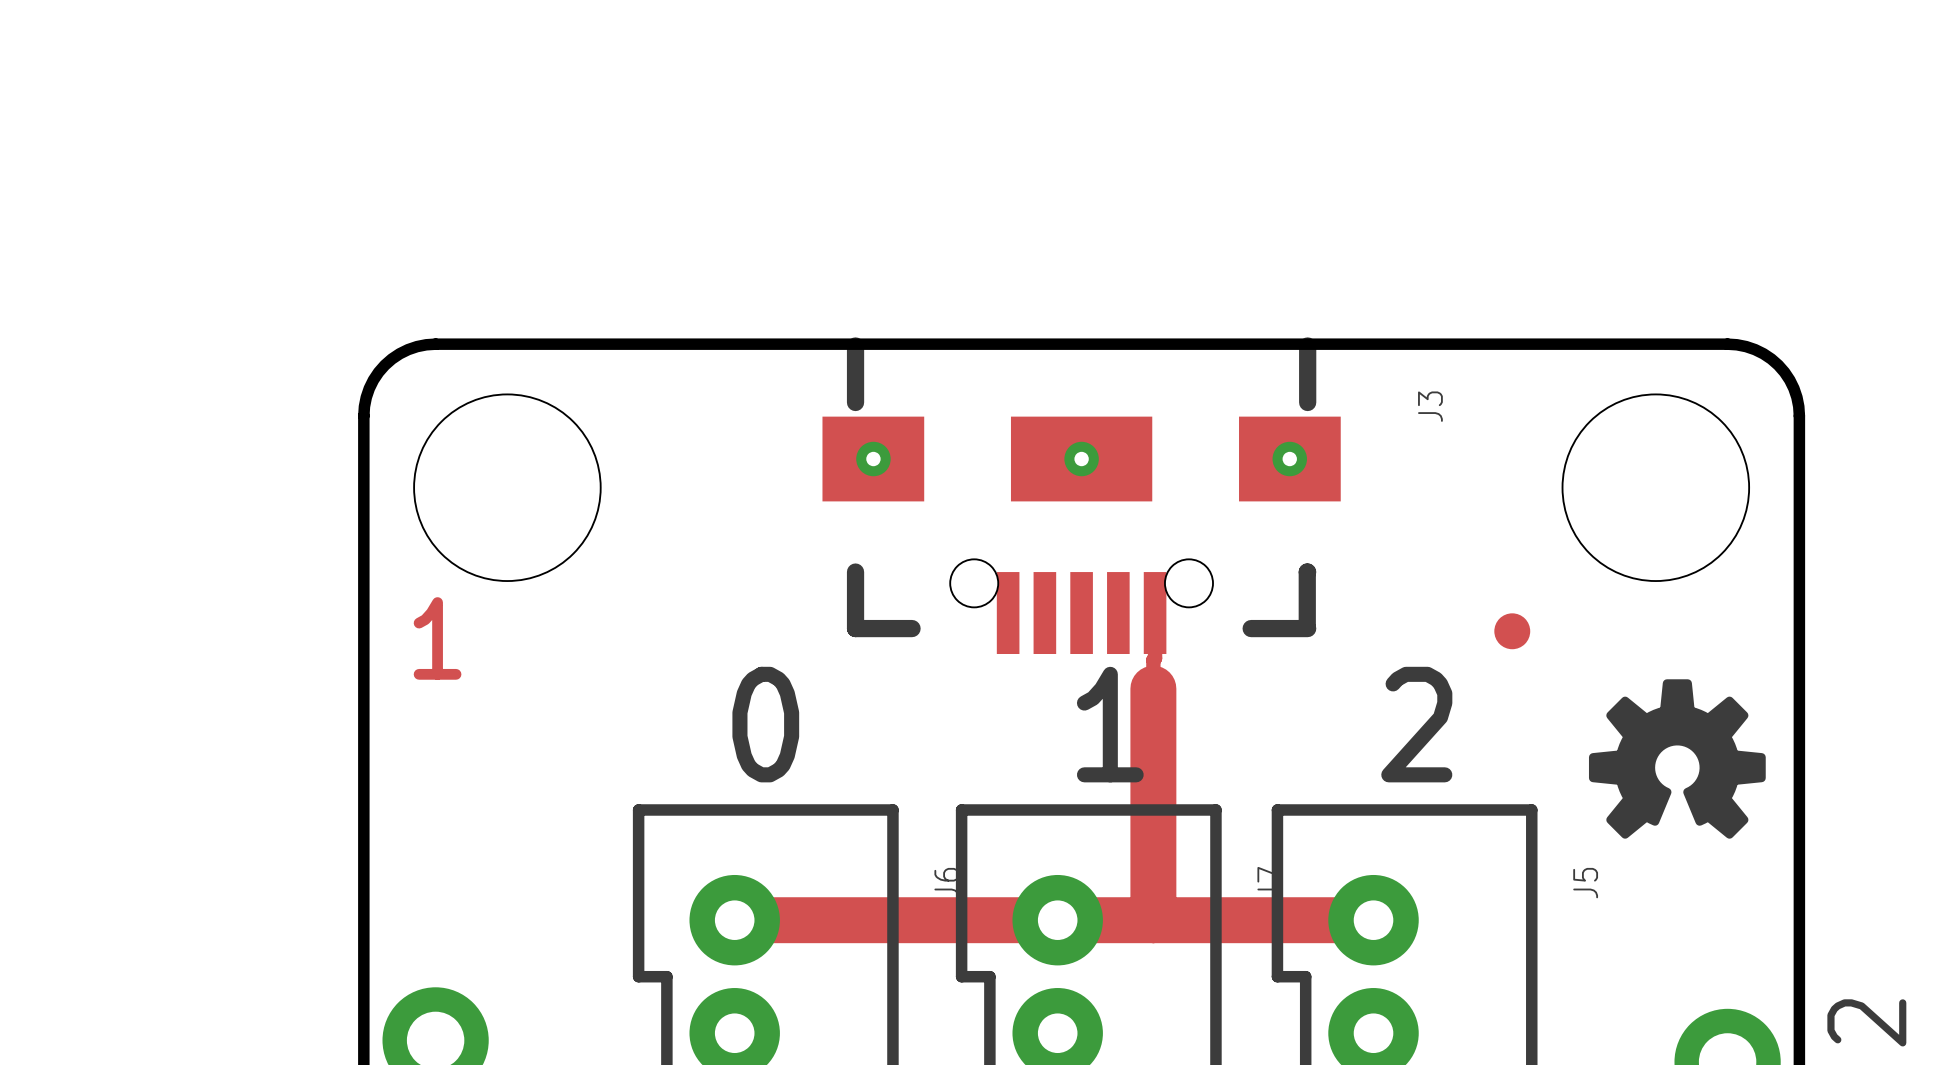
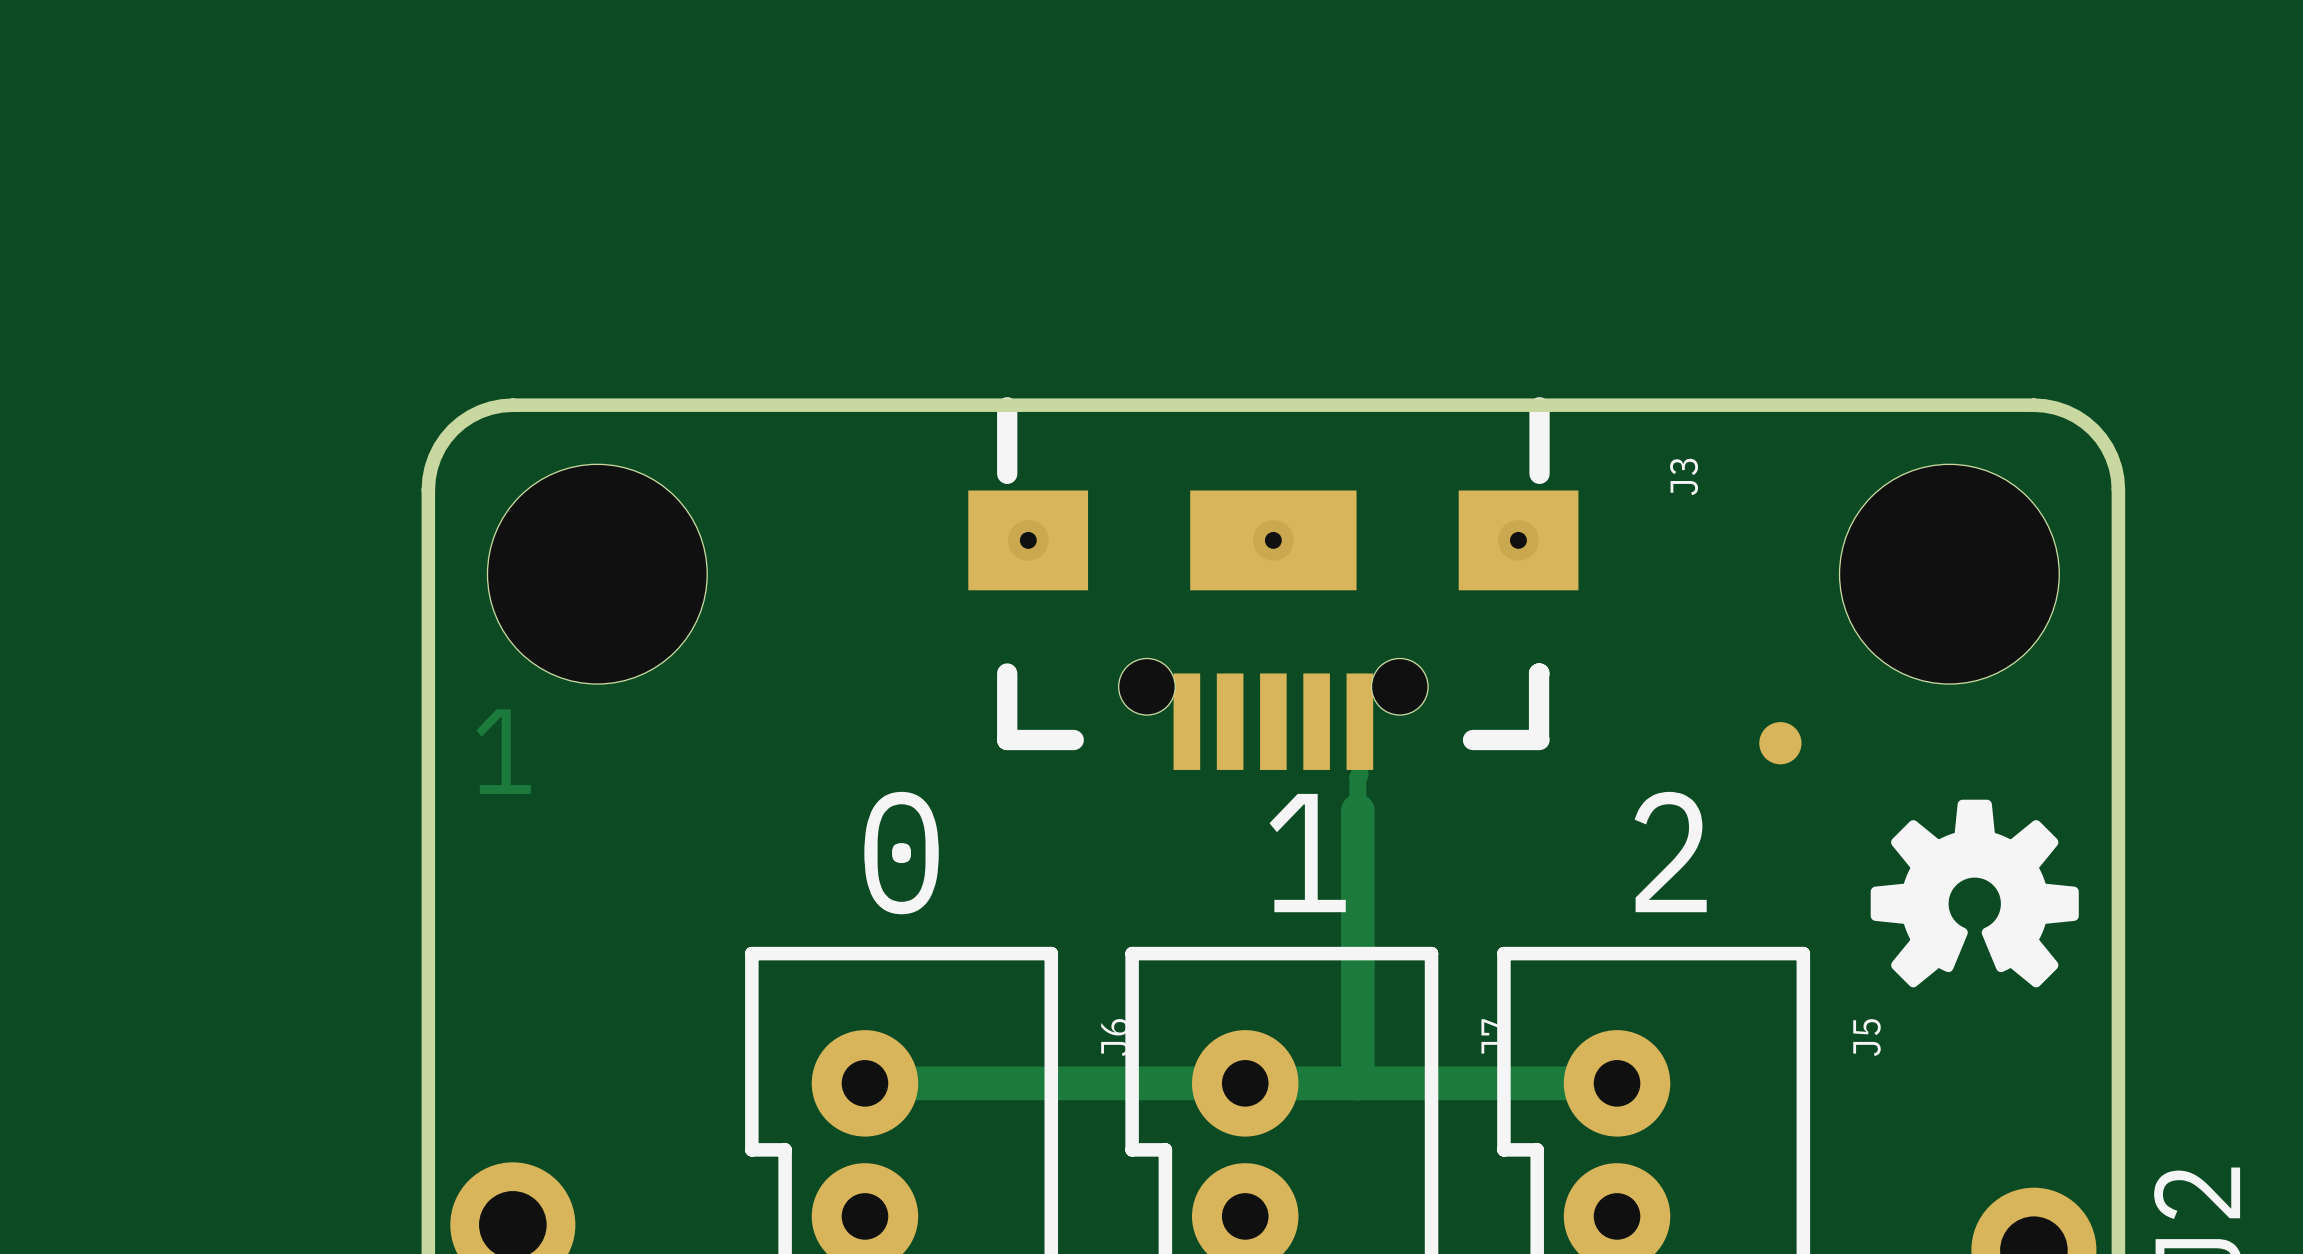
track width: thick (1153, 688) (1153, 920) -> thin (1357, 810) (1357, 1083)
track width: thick (734, 920) (1373, 920) -> thin (864, 1083) (1617, 1083)

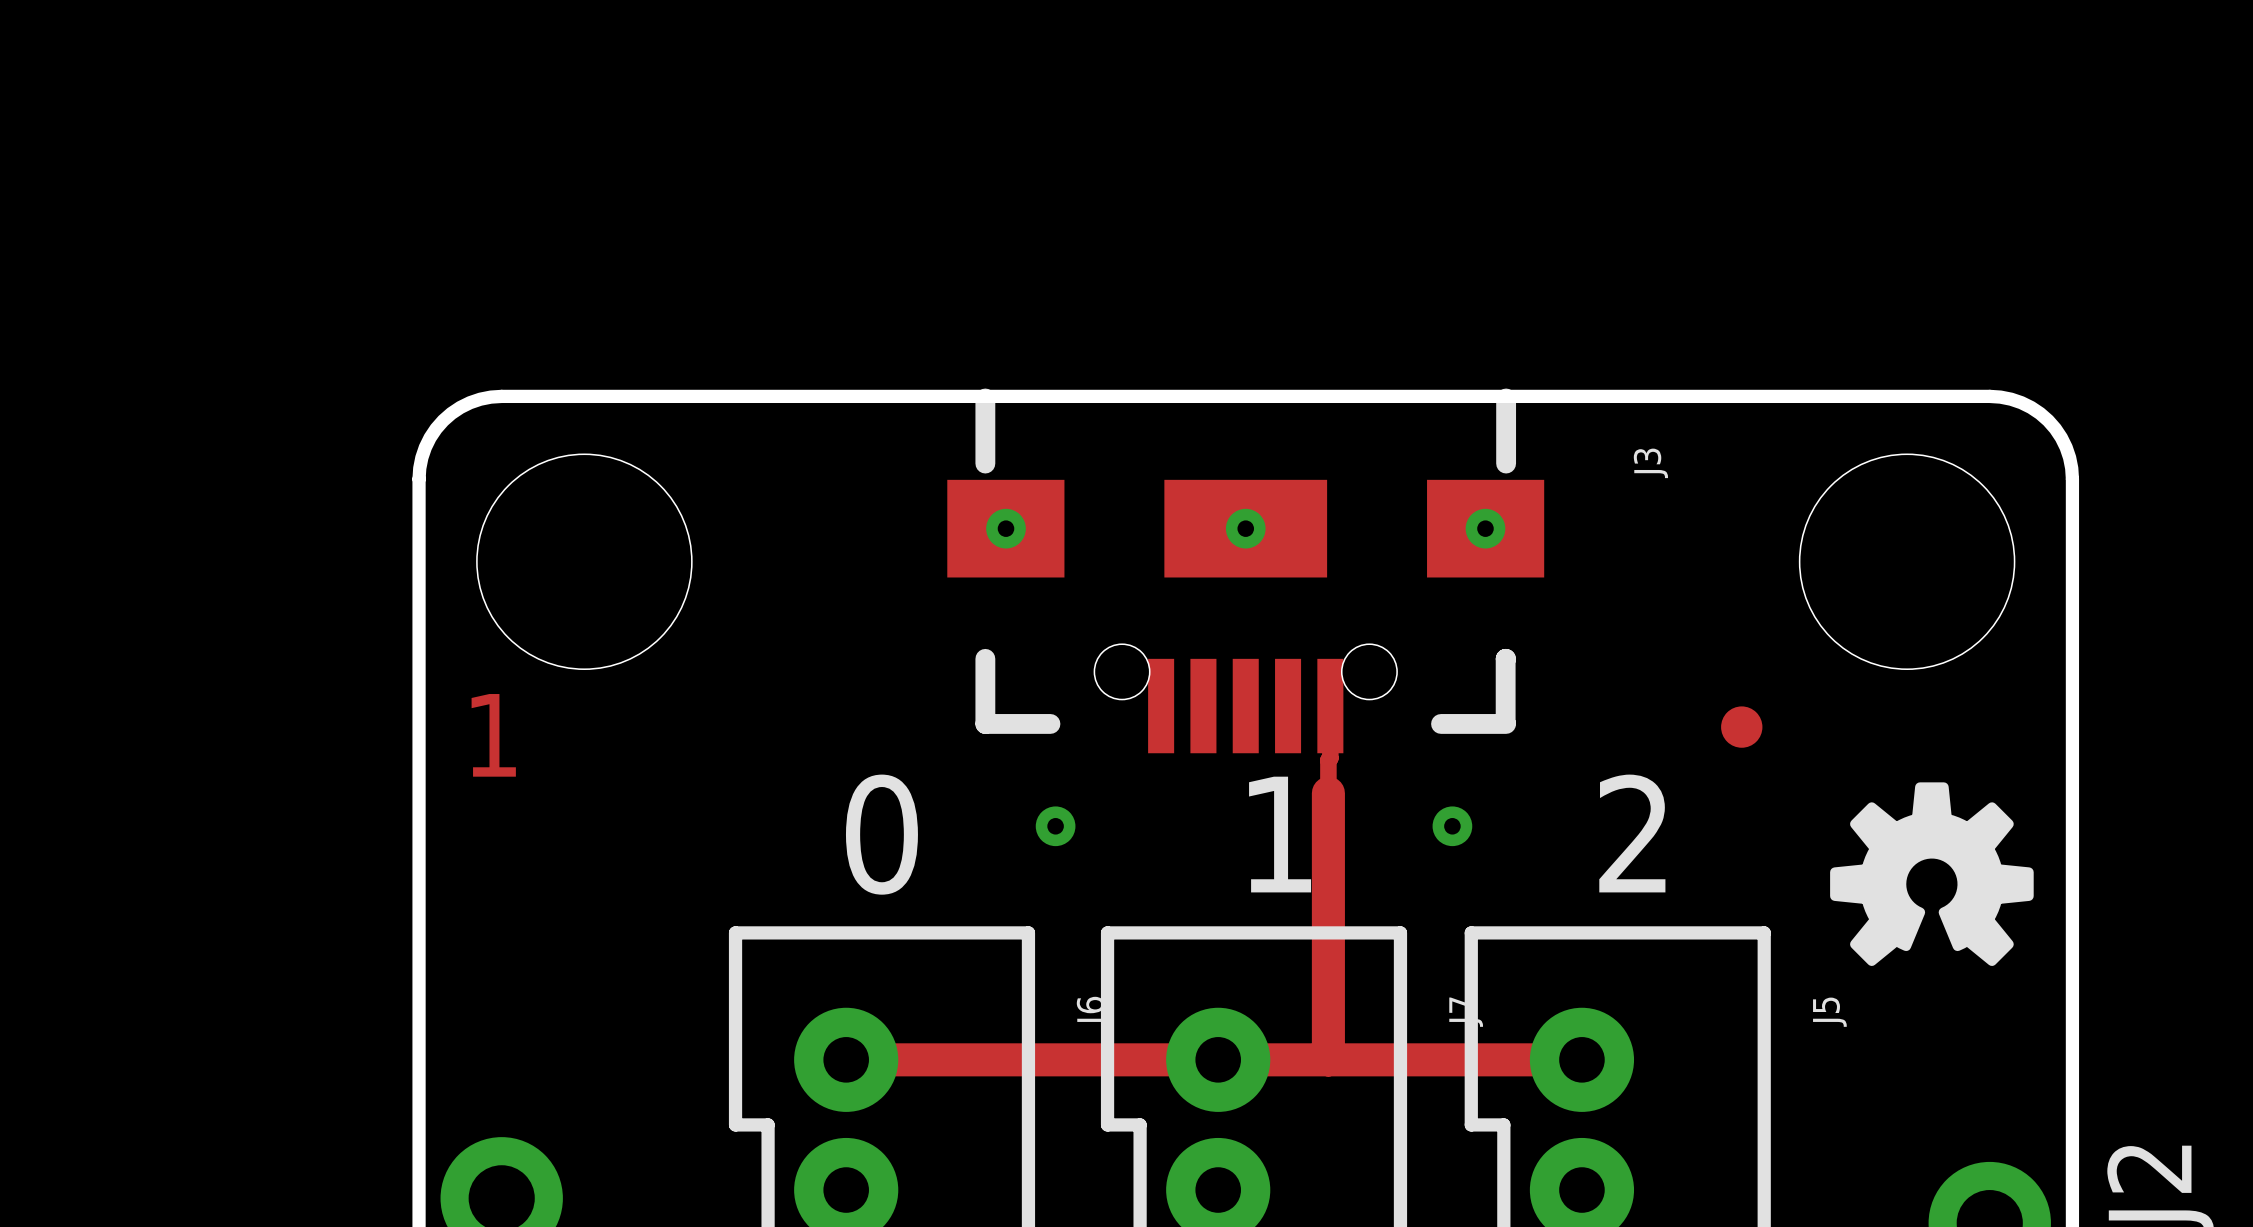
via: none -> (1055, 826)
via: none -> (1452, 826)

